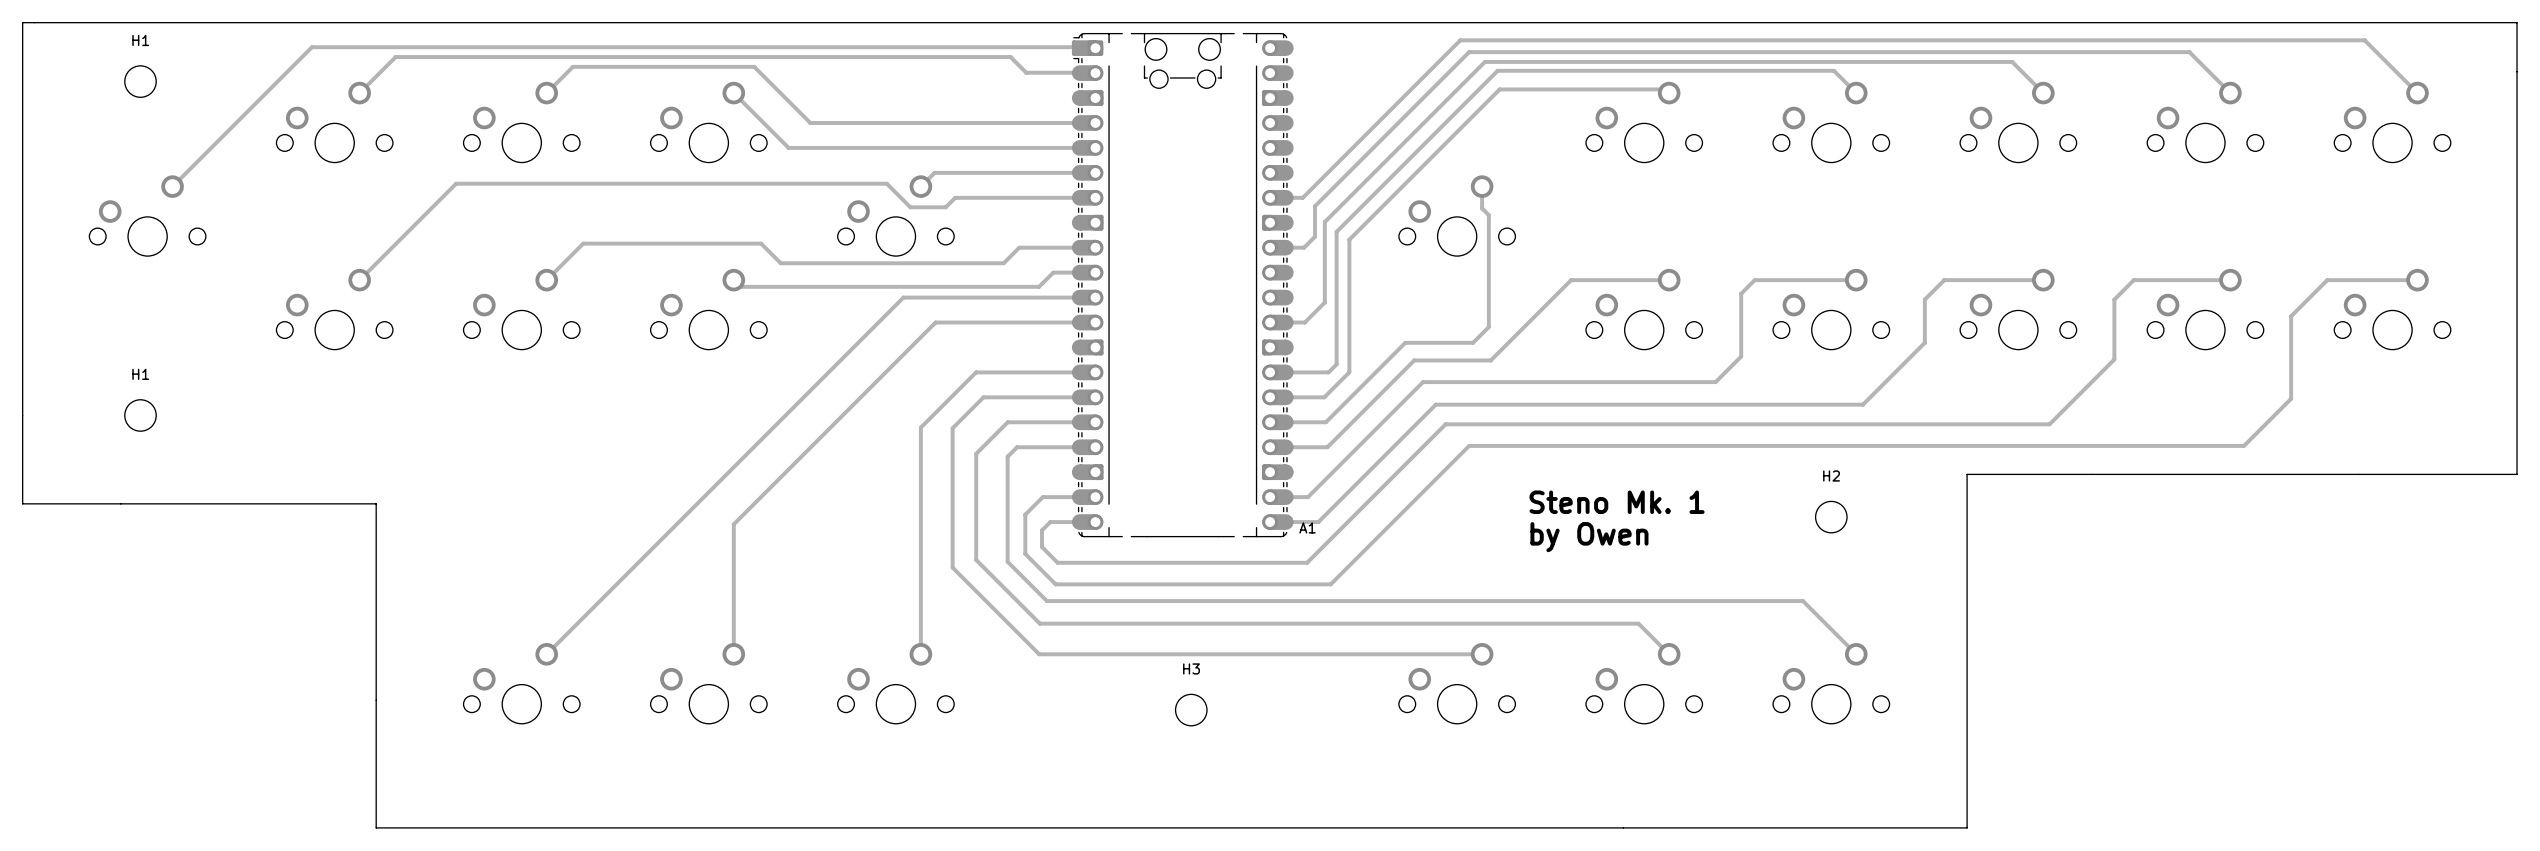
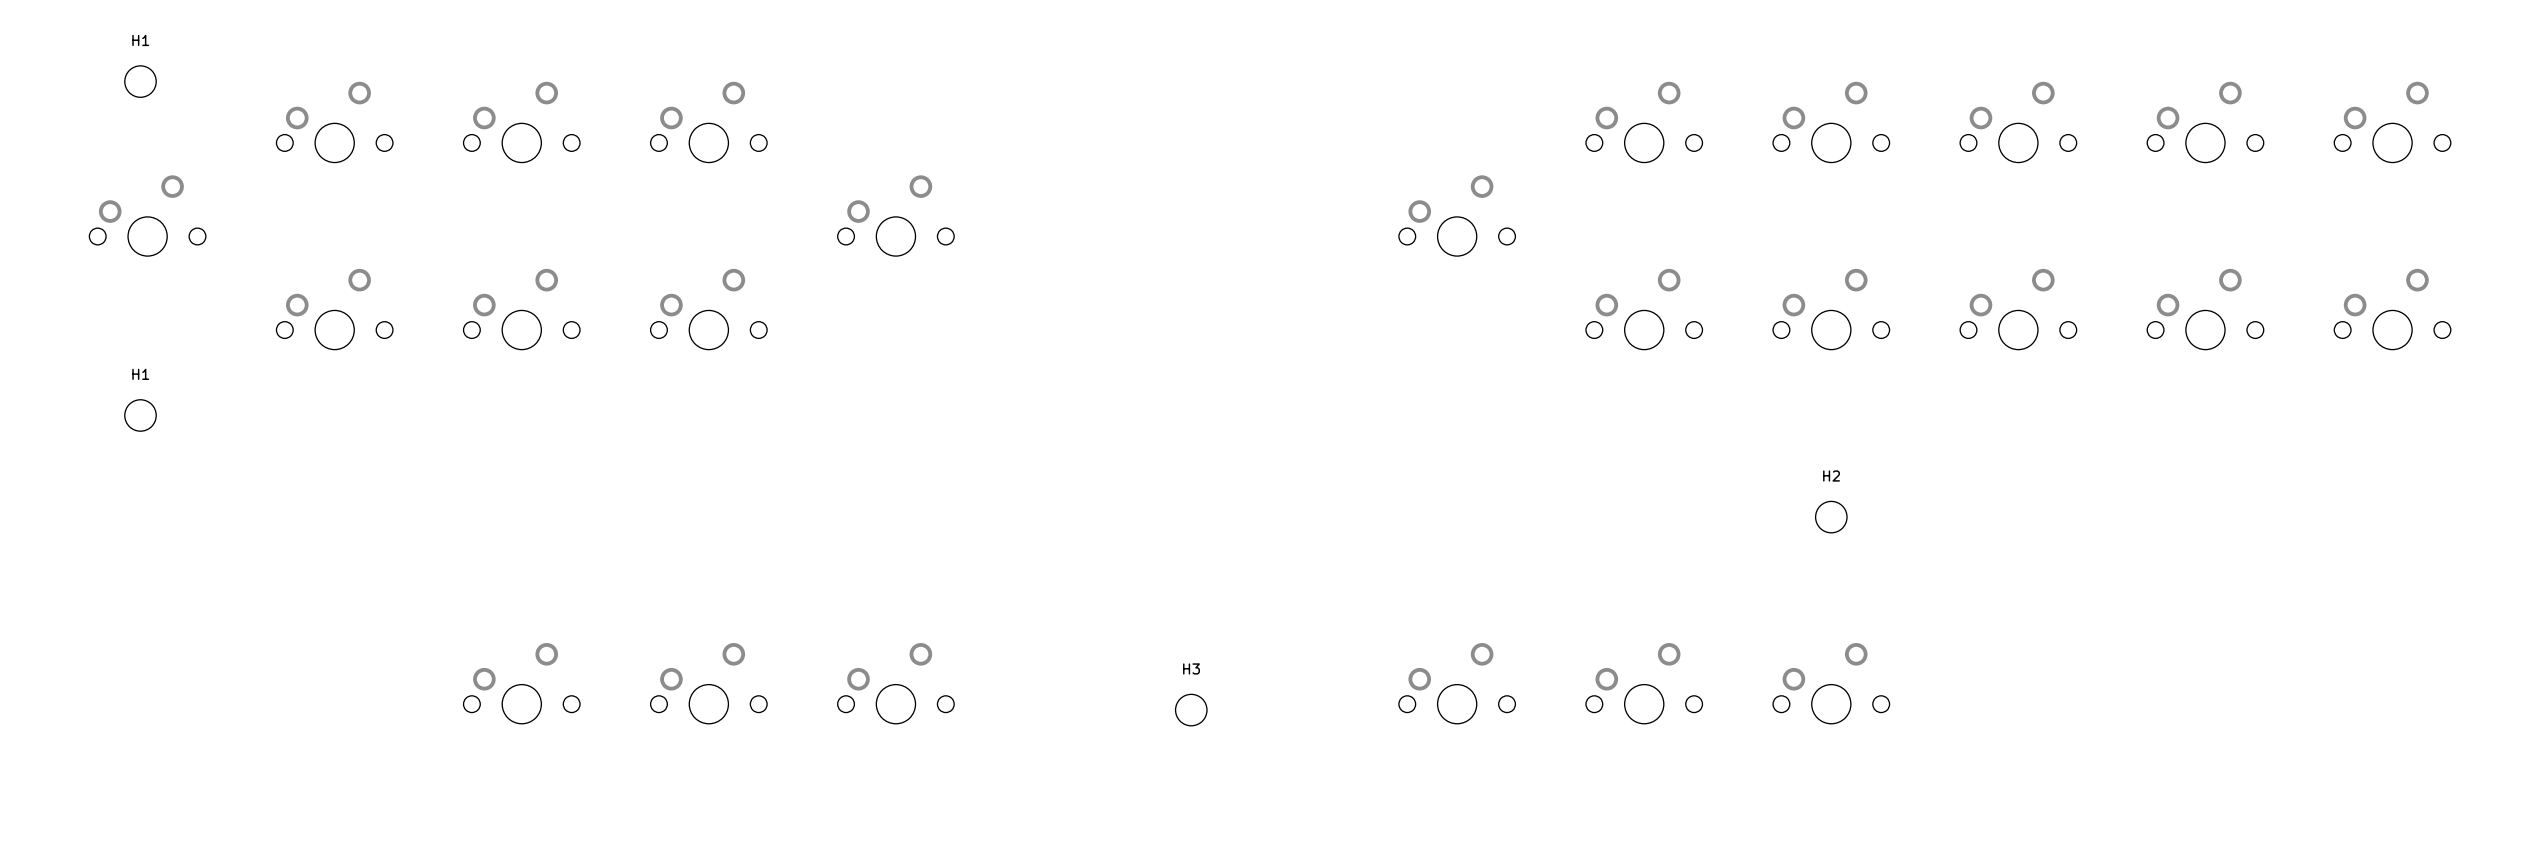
board edge: (22, 22) (22, 503) (376, 503) (376, 827) (1967, 827) (1967, 474) (2517, 474) (2517, 22) (22, 22) -> none
track: (1095, 48) (311, 47) (172, 186) -> none
track: (1087, 73) (1026, 72) (1010, 57) (395, 57) (359, 93) -> none
track: (546, 93) (572, 66) (754, 66) (810, 122) (1087, 122) -> none
track: (733, 93) (788, 147) (1095, 147) -> none
track: (1669, 93) (1665, 89) (1499, 89) (1349, 239) (1349, 372) (1324, 397) (1277, 397) -> none
track: (1856, 93) (1833, 70) (1497, 70) (1336, 231) (1336, 364) (1328, 372) (1277, 372) -> none
track: (2043, 93) (2012, 61) (1484, 61) (1324, 222) (1324, 302) (1304, 322) (1277, 322) -> none
track: (2230, 93) (2189, 52) (1469, 52) (1315, 206) (1315, 236) (1304, 247) (1277, 247) -> none
track: (2417, 93) (2364, 40) (1460, 40) (1302, 197) (1277, 197) -> none
track: (1087, 172) (934, 172) (920, 186) -> none
track: (1482, 186) (1482, 208) (1488, 215) (1488, 327) (1473, 342) (1405, 342) (1325, 422) (1270, 422) -> none
track: (1095, 197) (955, 197) (945, 207) (910, 207) (886, 183) (456, 183) (359, 280) -> none
track: (1095, 247) (1019, 247) (1003, 263) (780, 263) (761, 243) (583, 243) (546, 280) -> none
track: (1095, 272) (1053, 272) (1039, 286) (740, 286) (733, 280) -> none
track: (1669, 280) (1571, 280) (1490, 360) (1414, 360) (1327, 447) (1277, 447) -> none
track: (1856, 280) (1754, 280) (1741, 293) (1741, 356) (1715, 382) (1423, 382) (1307, 497) (1277, 497) -> none
track: (2043, 280) (1944, 280) (1924, 299) (1924, 342) (1862, 404) (1435, 404) (1318, 522) (1277, 522) -> none
track: (2230, 280) (2133, 280) (2114, 299) (2114, 359) (2049, 424) (1445, 424) (1307, 562) (1057, 562) (1042, 547) (1042, 530) (1050, 522) (1095, 522) -> none
track: (2417, 280) (2327, 280) (2291, 316) (2291, 398) (2244, 445) (1469, 445) (1330, 584) (1055, 584) (1025, 553) (1025, 514) (1042, 497) (1095, 497) -> none
A1: (1182, 285) -> none
track: (1095, 297) (903, 297) (546, 654) -> none
track: (1095, 322) (935, 322) (733, 524) (733, 654) -> none
track: (1087, 372) (976, 372) (920, 427) (920, 654) -> none
track: (1095, 397) (983, 397) (952, 428) (952, 567) (1039, 654) (1482, 654) -> none
track: (1095, 422) (1007, 422) (976, 453) (976, 559) (1039, 623) (1638, 623) (1669, 654) -> none
track: (1087, 447) (1017, 447) (1007, 456) (1007, 561) (1046, 601) (1803, 601) (1856, 654) -> none
text: Steno Mk. 1 (1617, 502) -> none
text: by Owen (1589, 537) -> none

